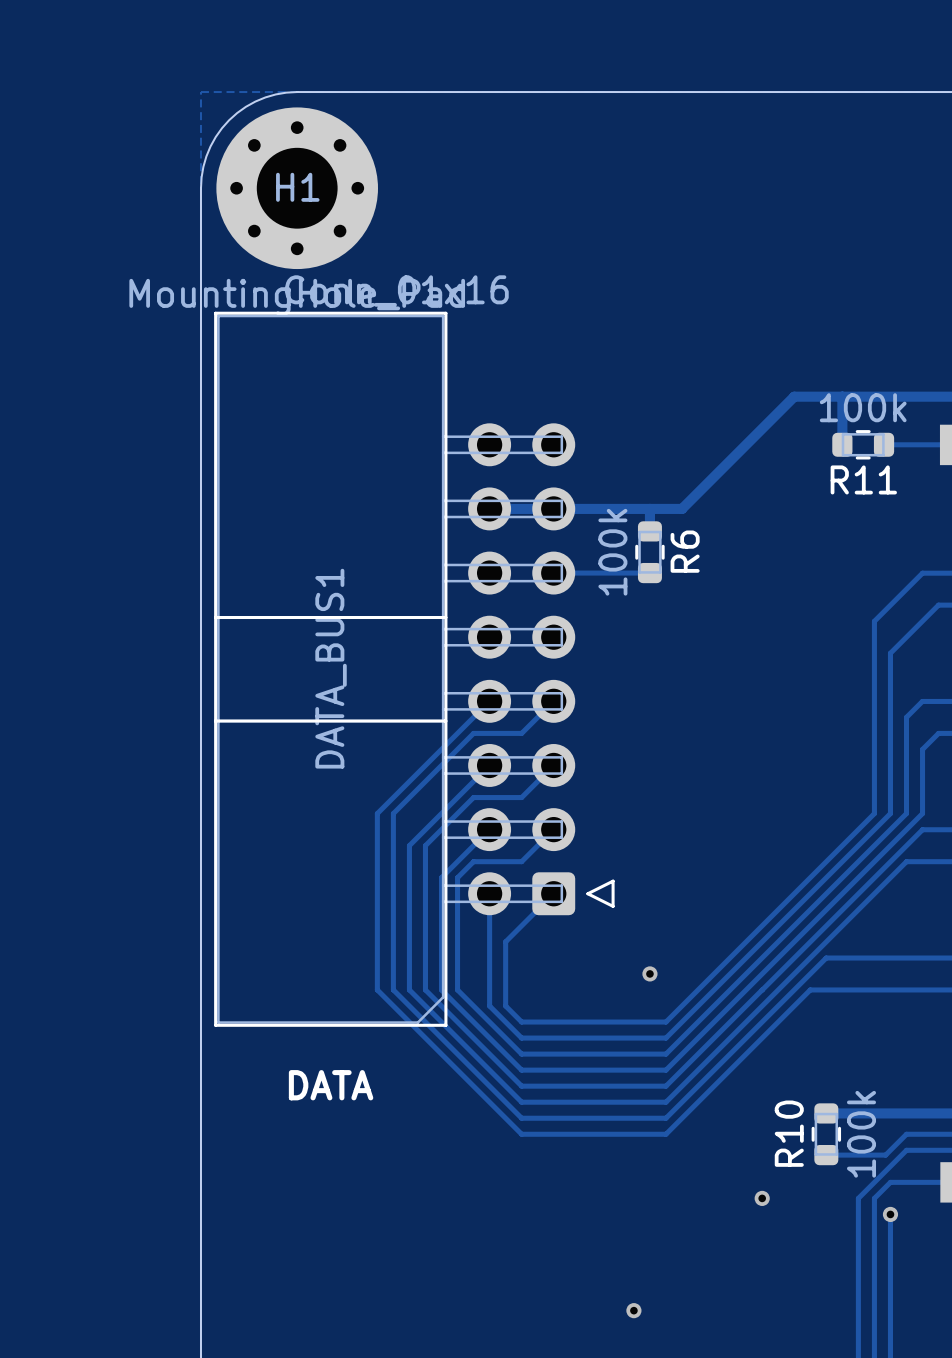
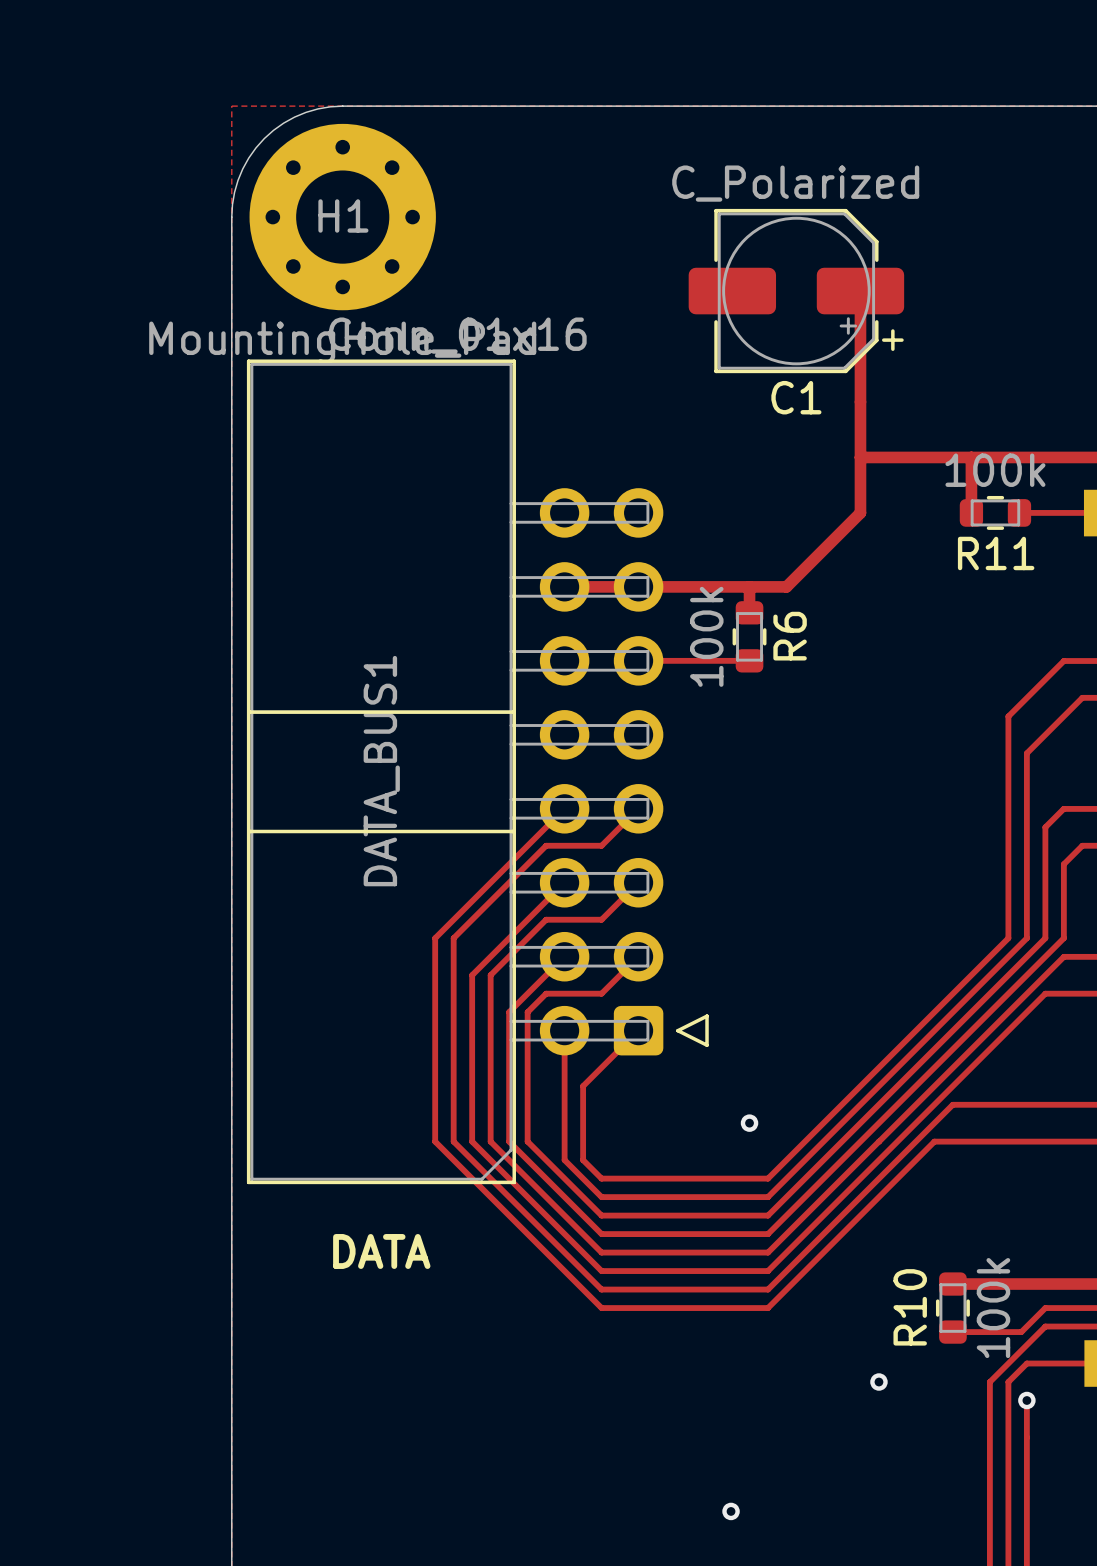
C1: none -> C_Polarized (796, 291)
track: none -> (860, 291) (860, 512)
track: (794, 396) (746, 444) -> (915, 457) (860, 457)

